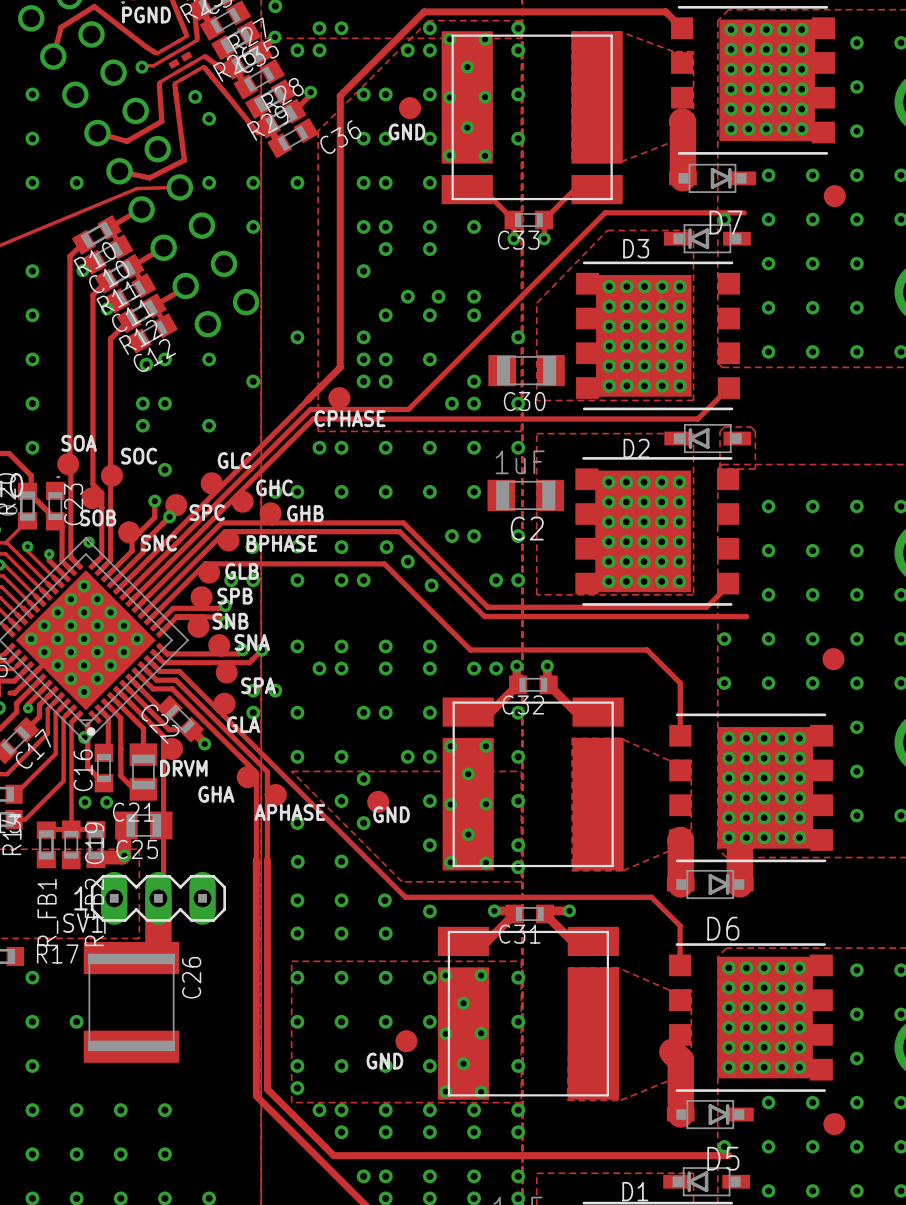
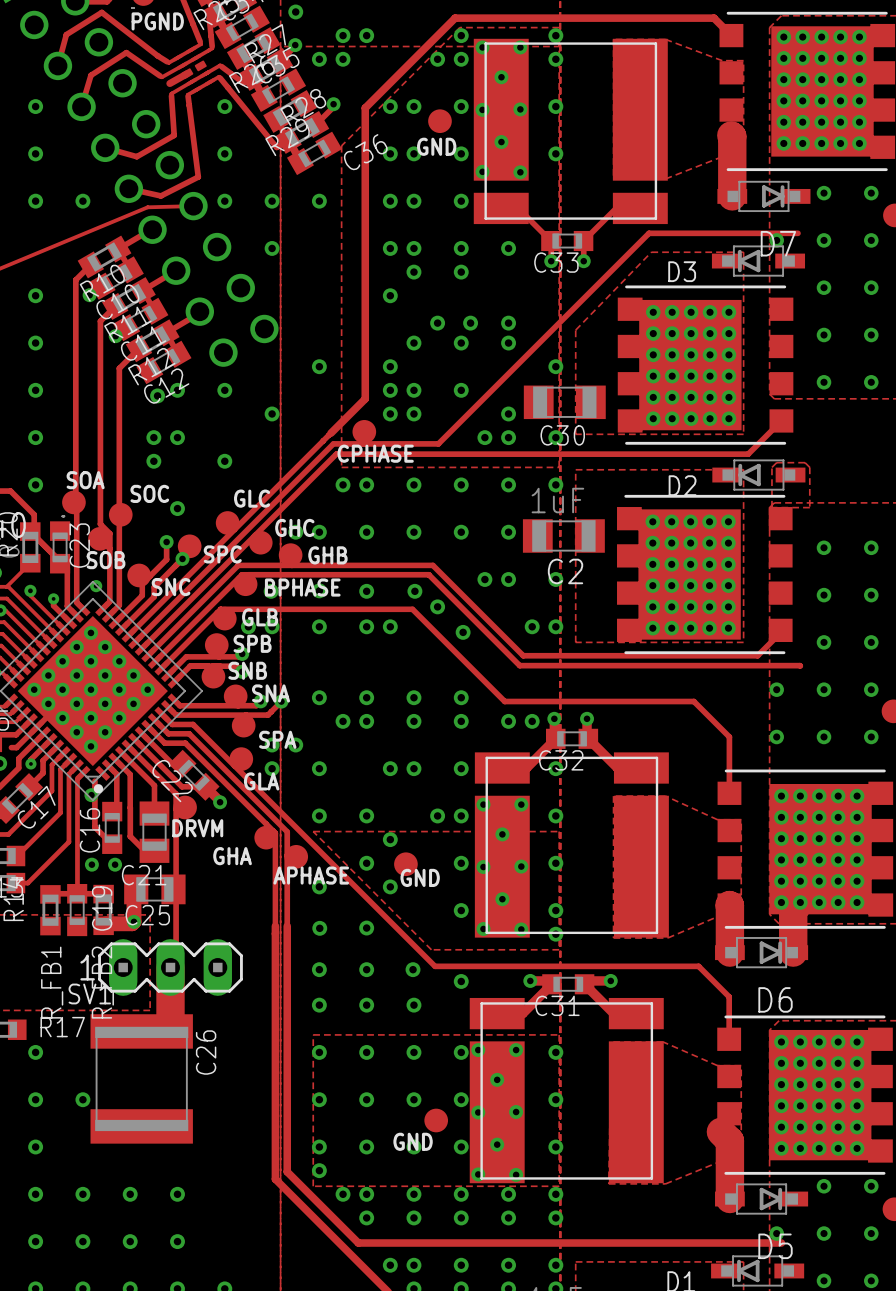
track: (169, 56) (153, 65) (142, 67) -> (182, 65) (161, 77) (126, 52) (90, 75) (81, 106)
track: none -> (187, 73) (169, 83)
via: (142, 67) -> none
via: none -> (224, 106)
via: (195, 96) -> none
via: (209, 118) -> none
via: none -> (224, 153)

